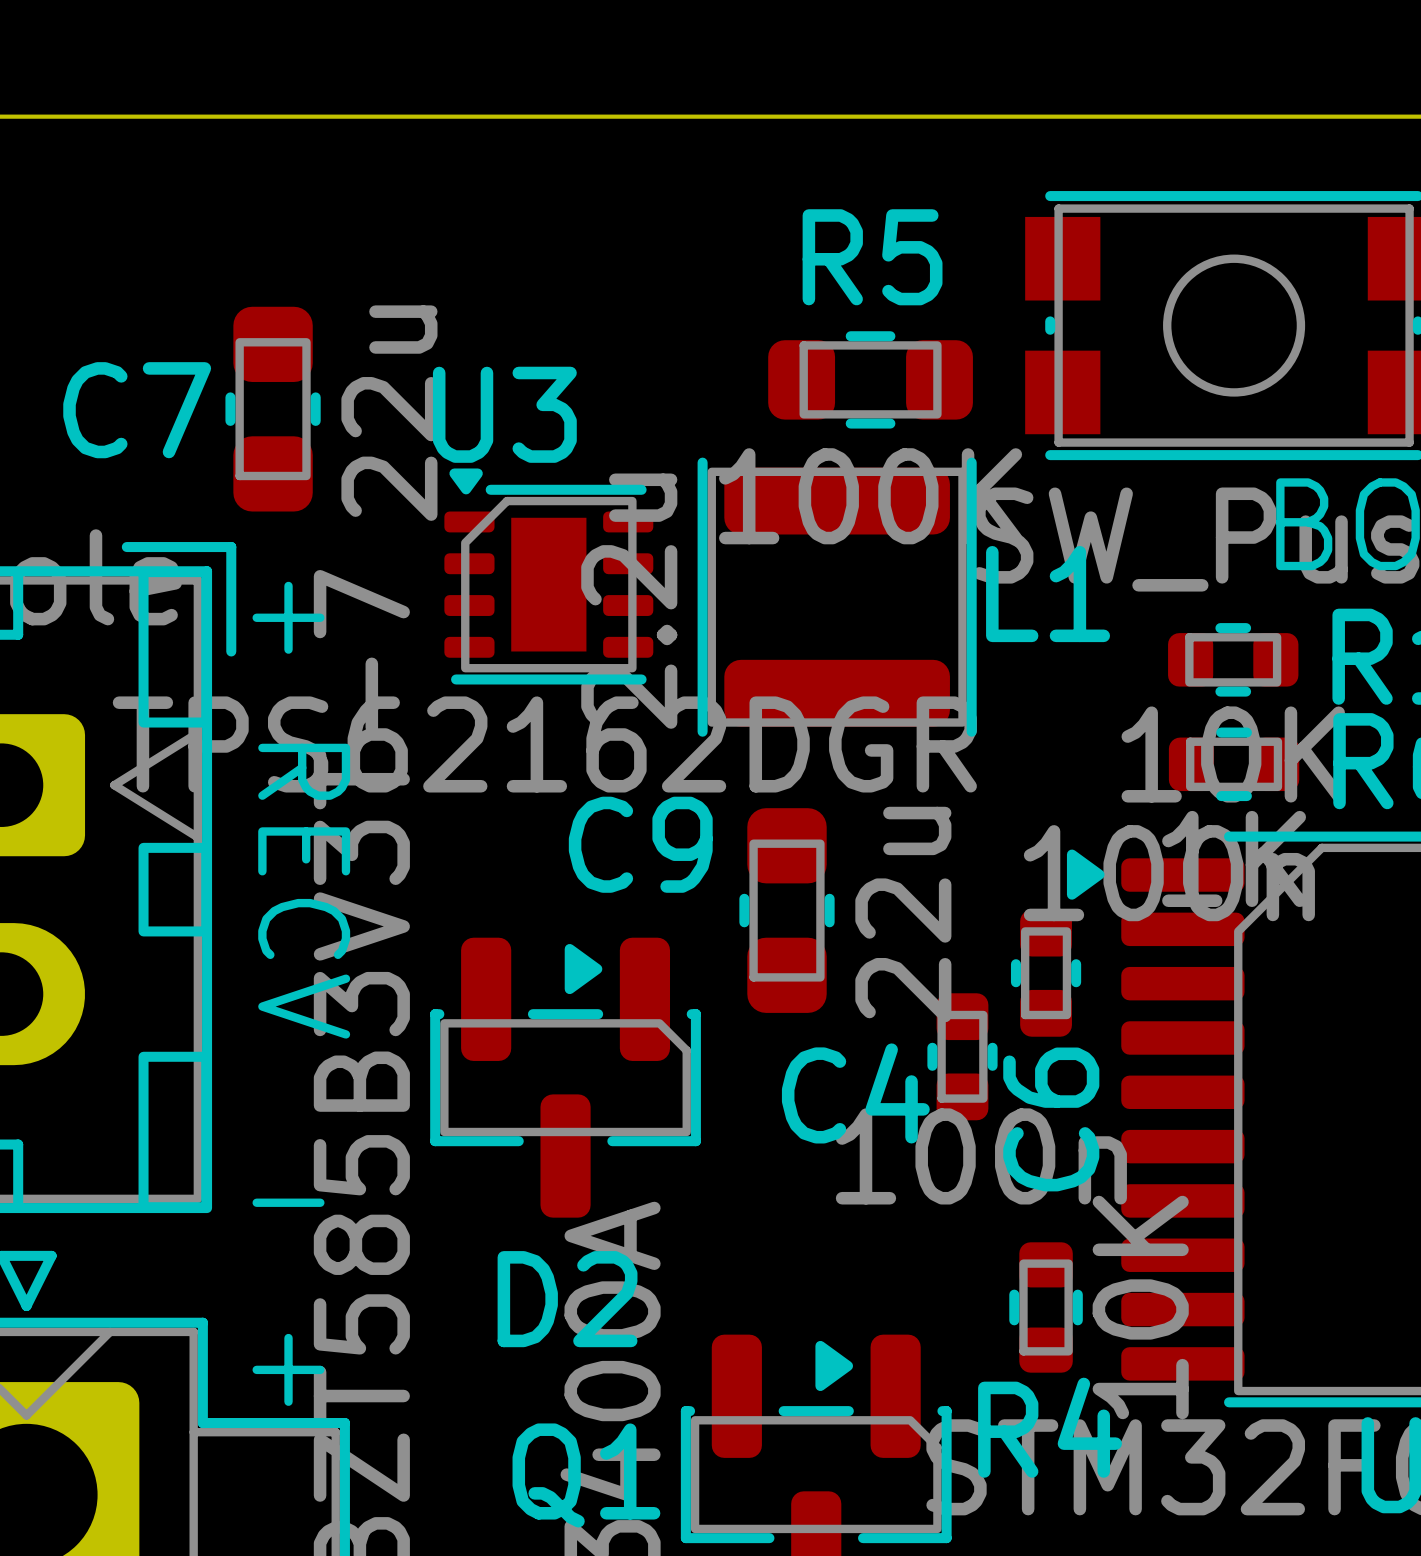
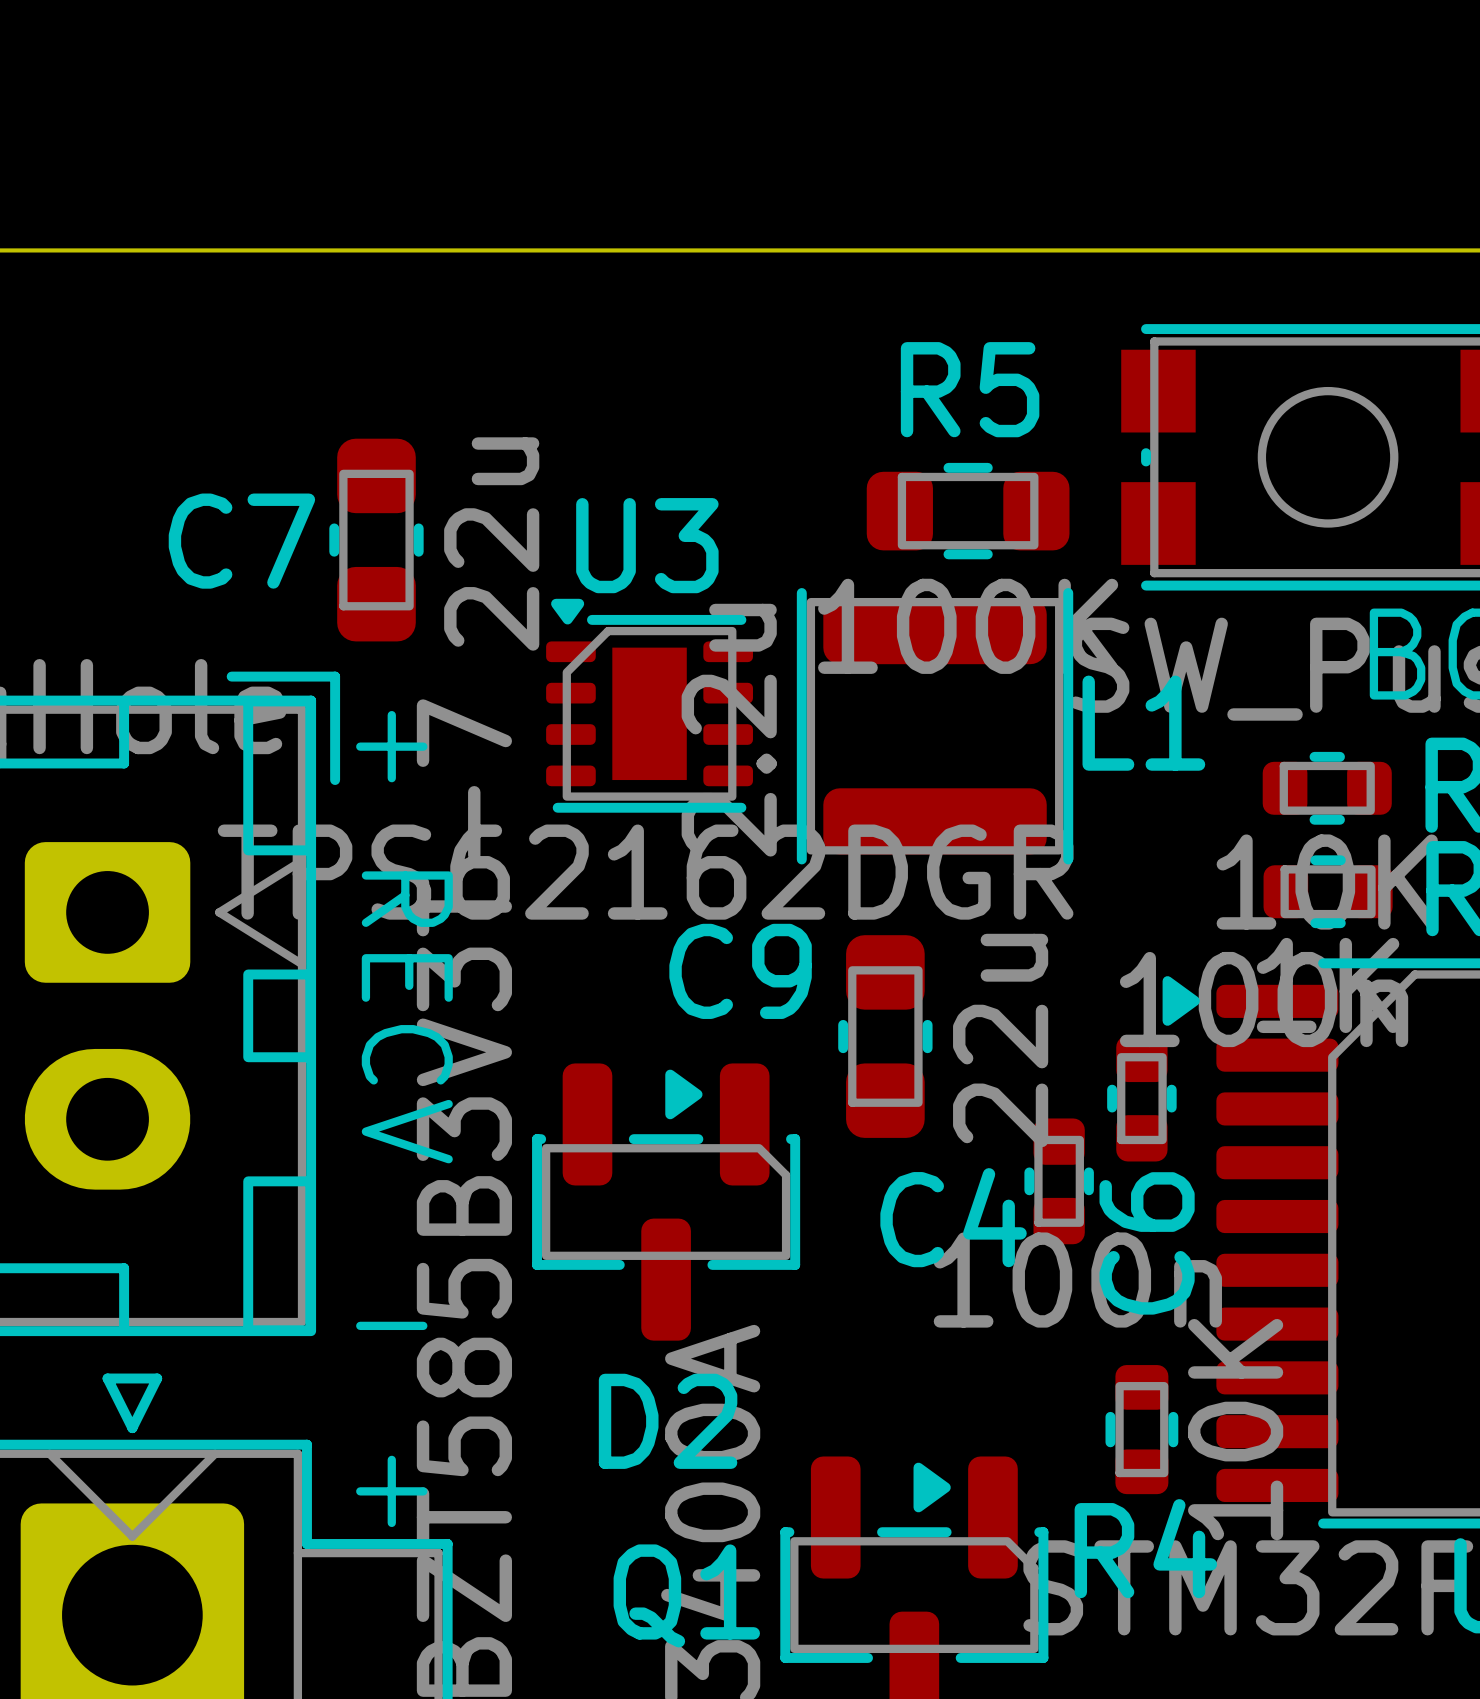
U3 name position: U3 (504, 414) -> U3 (647, 545)

